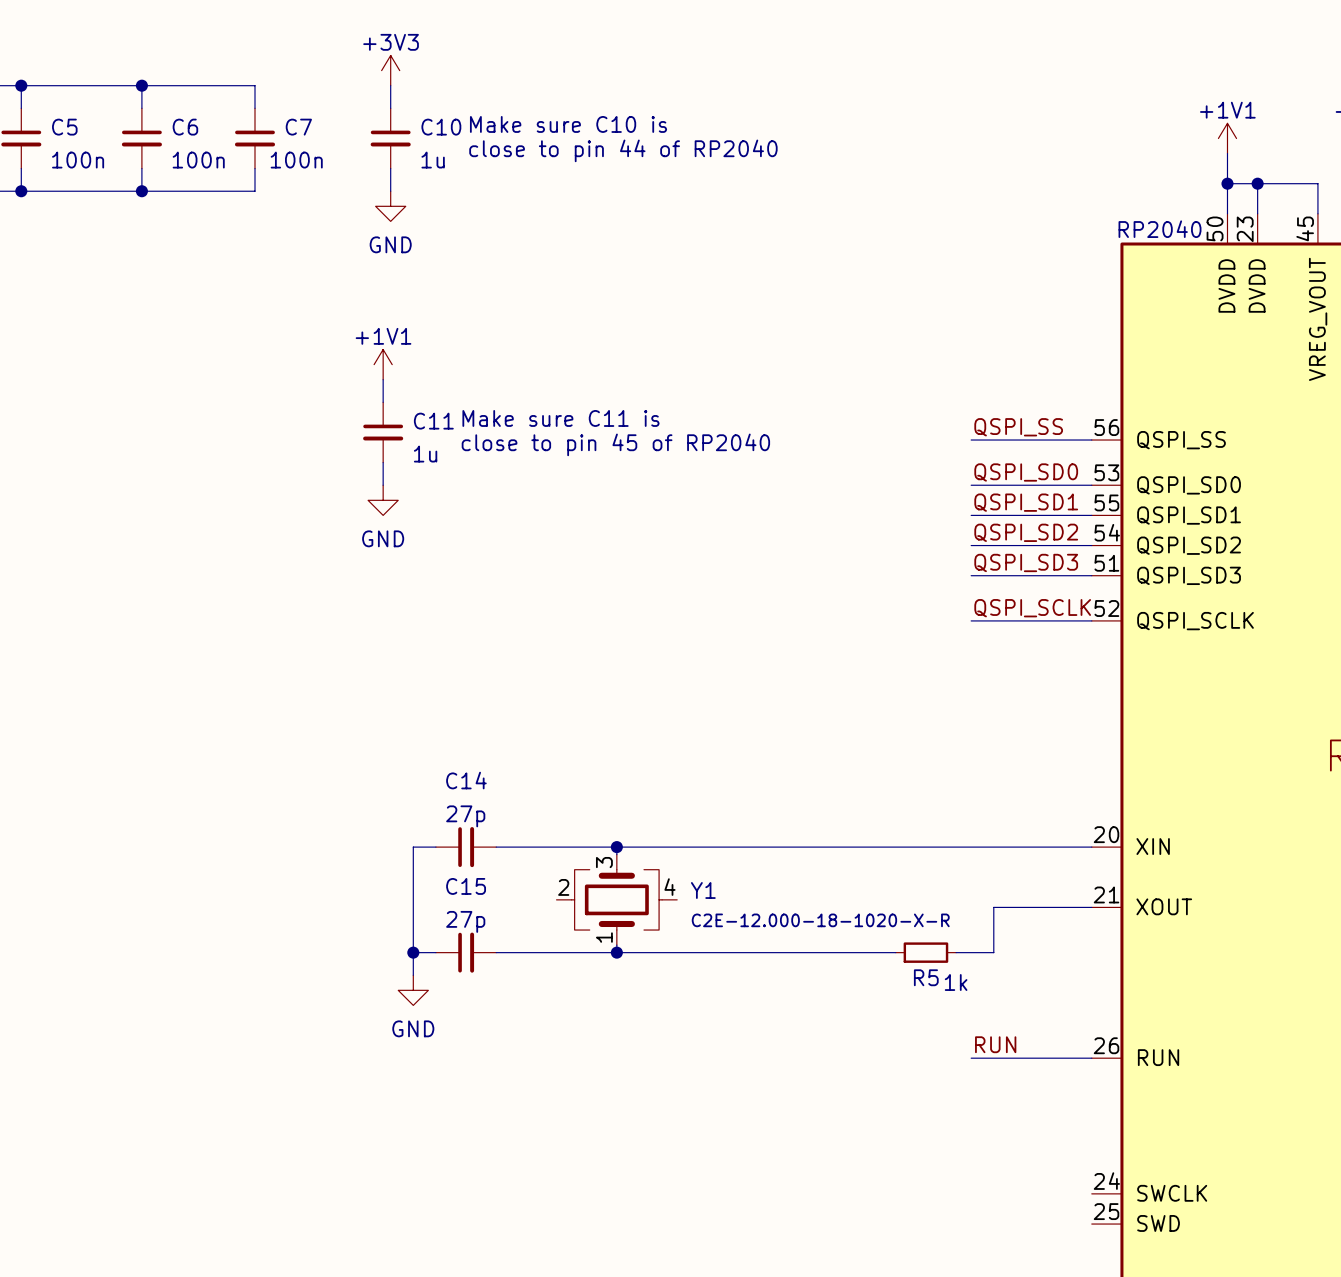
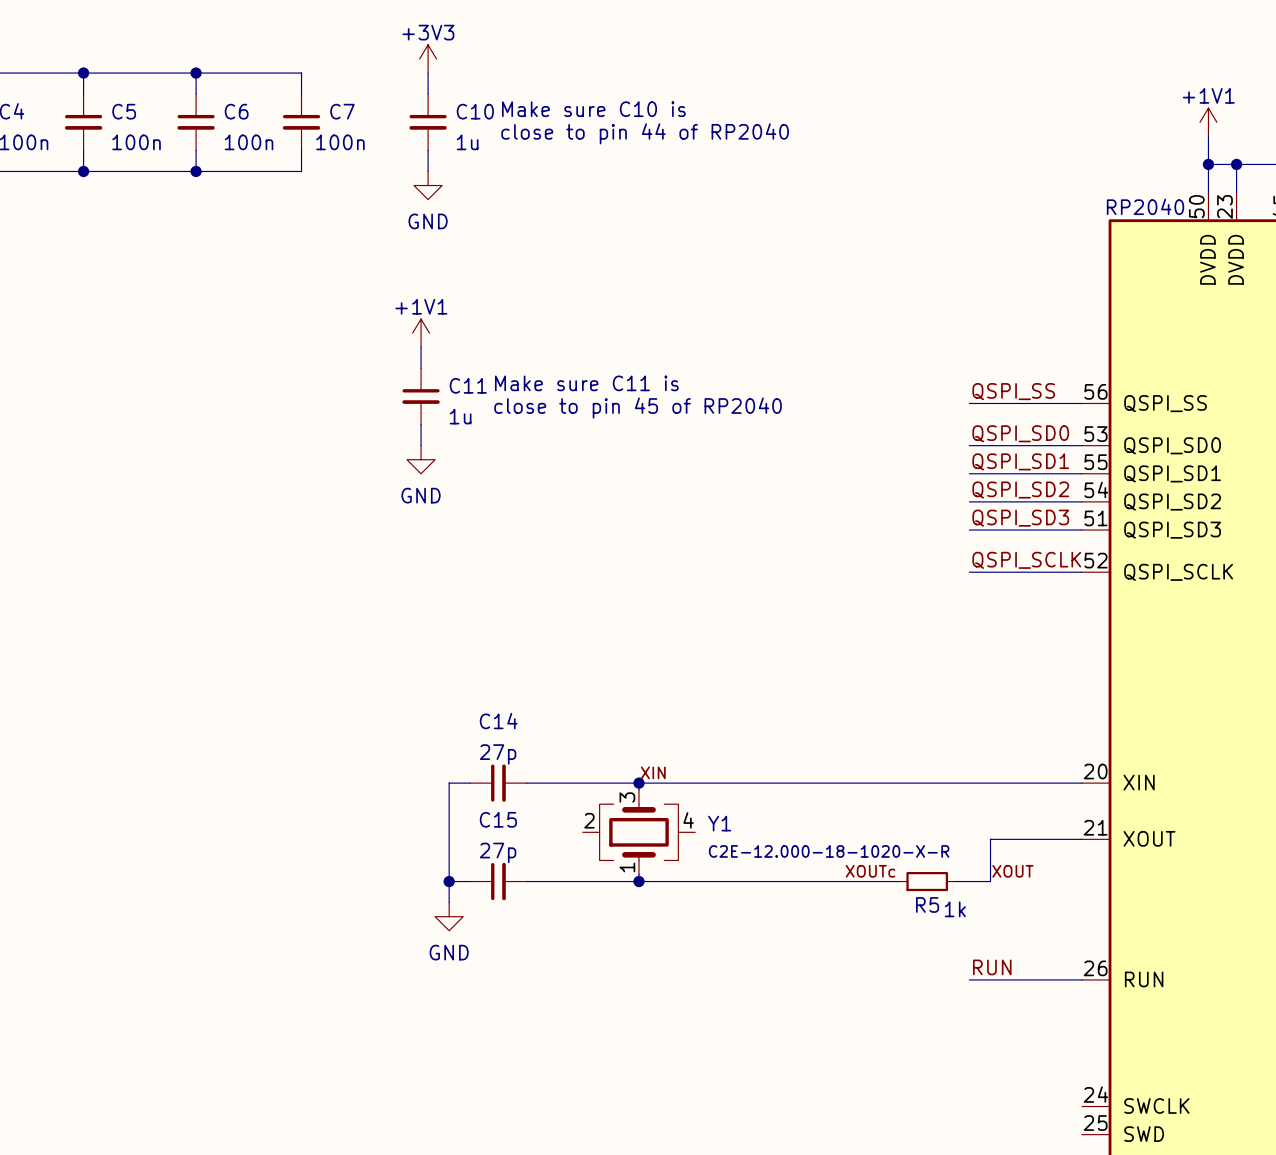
label: none -> XIN (653, 772)
label: none -> XOUTc (870, 871)
label: none -> XOUT (1012, 871)

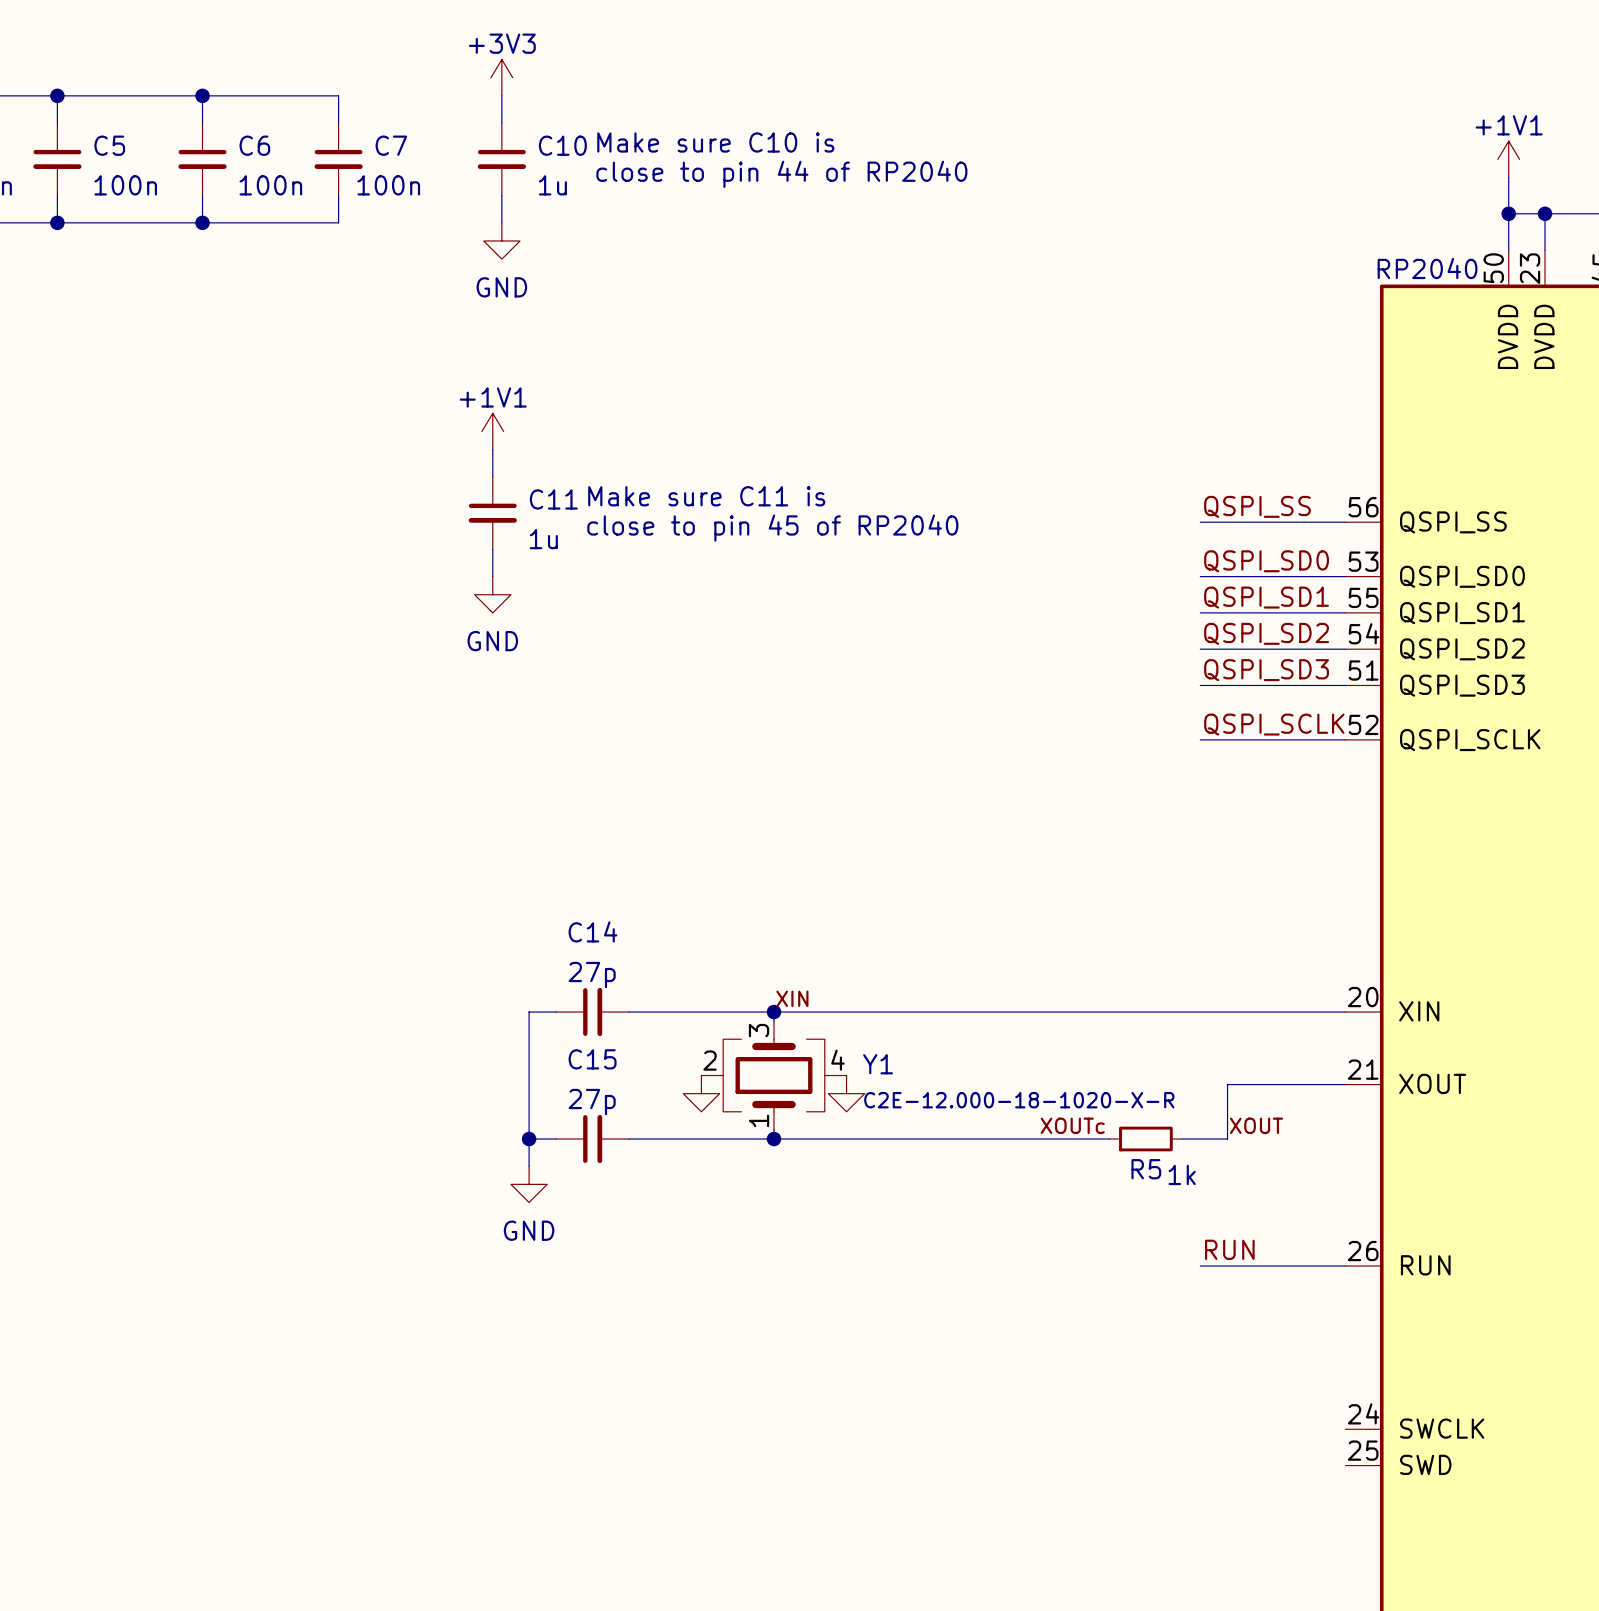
power symbol: none -> (701, 1093)
power symbol: none -> (846, 1093)

